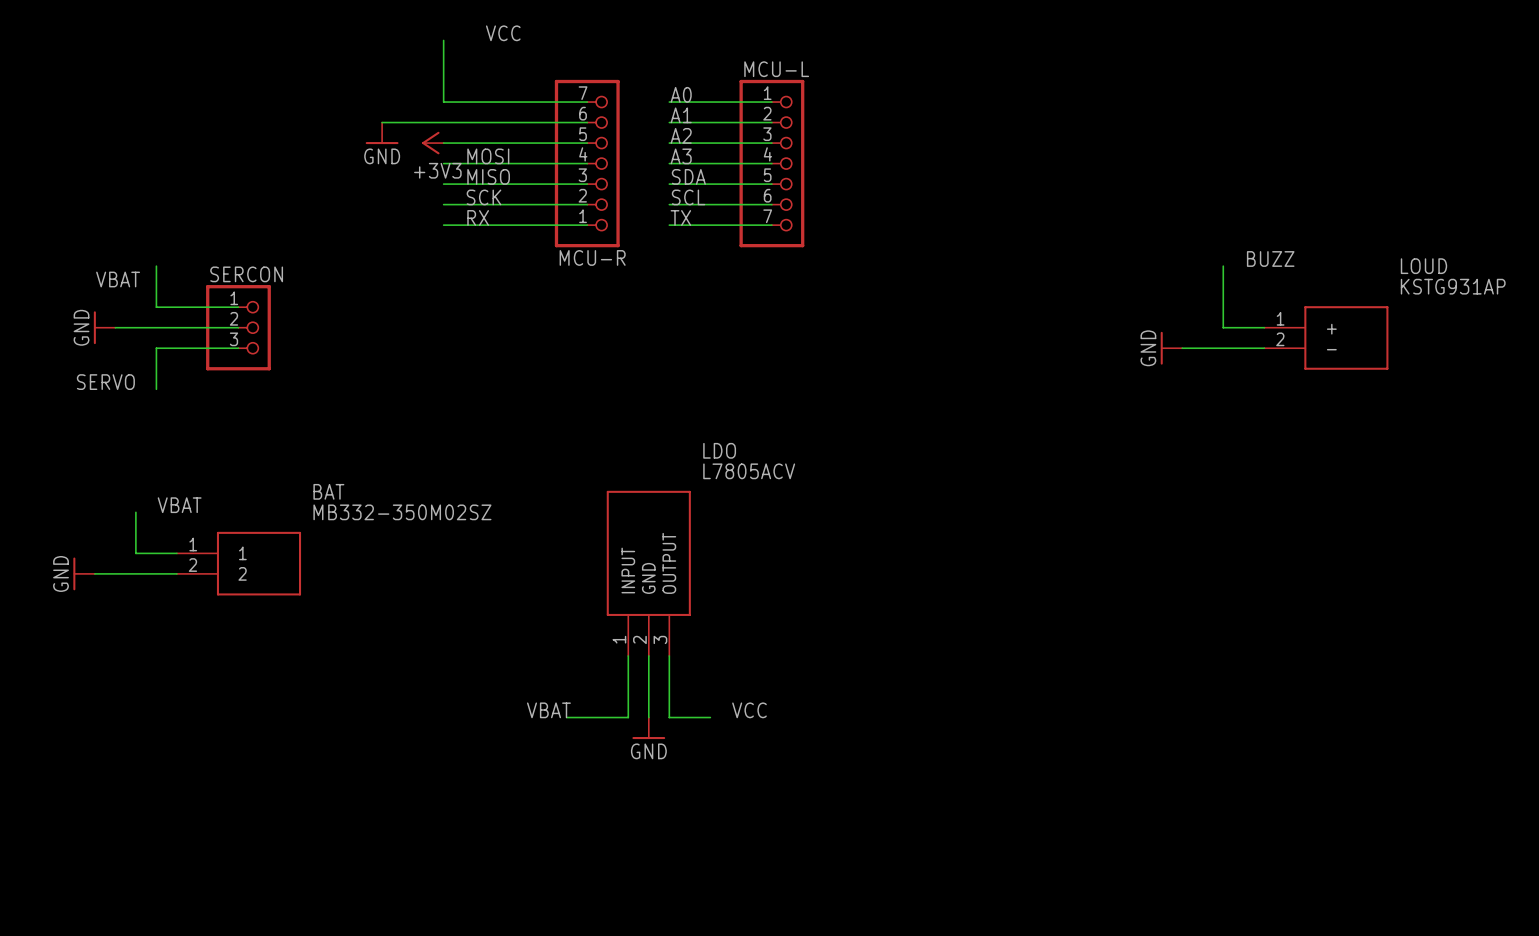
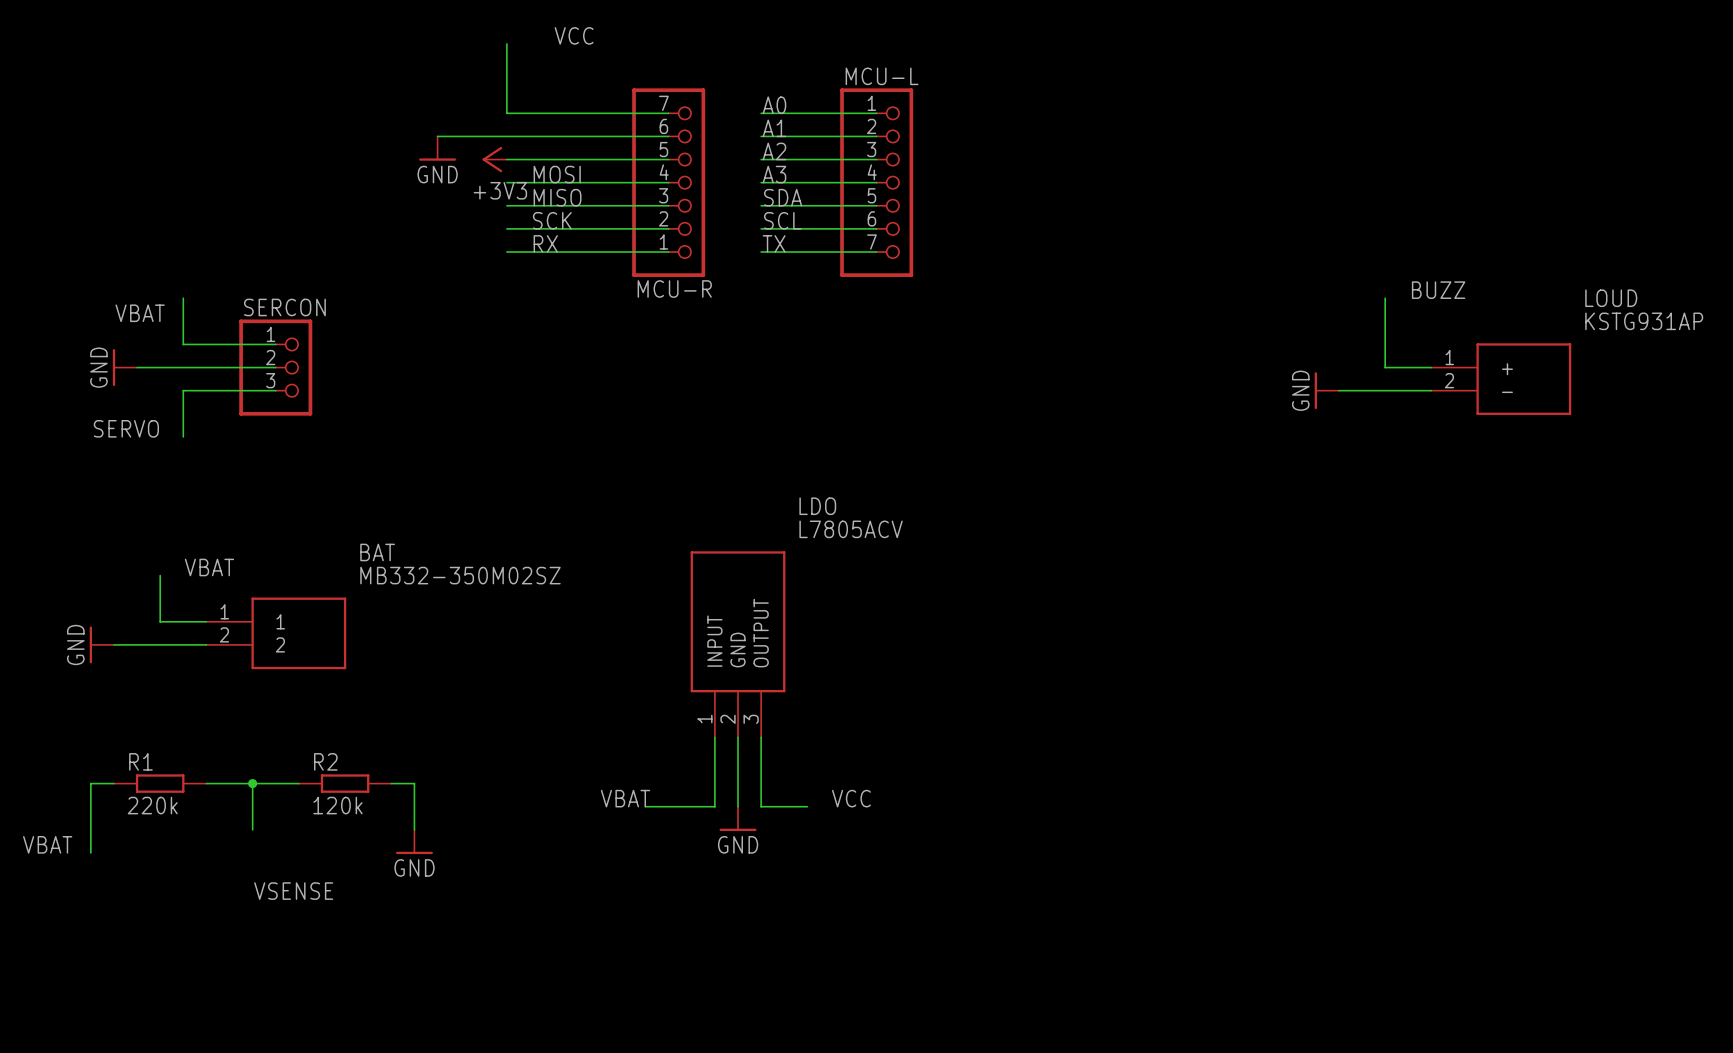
wire: none -> (113, 783) (90, 783) (90, 852)
R1: none -> 220k (160, 783)
wire: none -> (206, 783) (298, 783)
wire: none -> (252, 783) (252, 829)
junction: none -> (252, 783)
R2: none -> 120k (345, 783)
wire: none -> (391, 783) (414, 783) (414, 829)
power symbol: none -> GND (414, 841)
label: none -> VBAT (47, 844)
label: none -> VSENSE (293, 891)

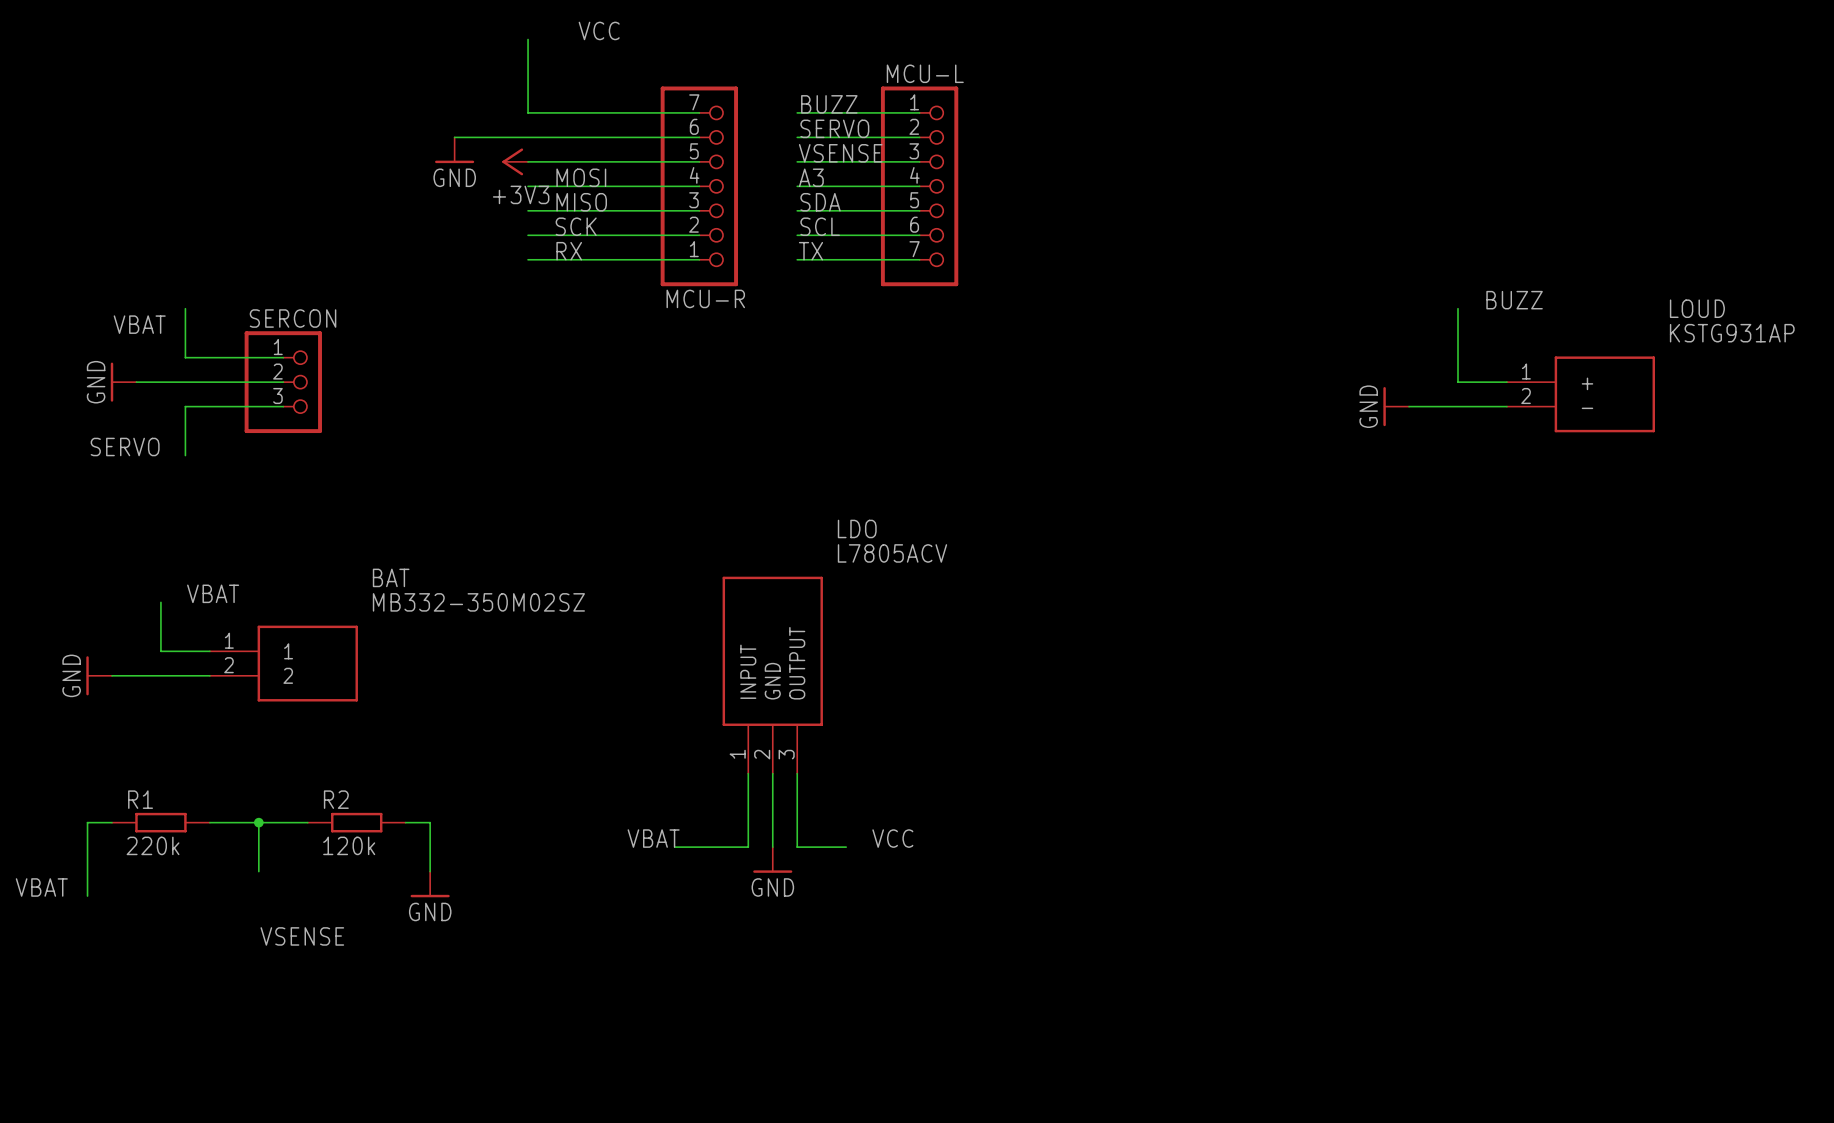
label: A0 (774, 105) -> BUZZ (829, 104)
label: A1 (774, 128) -> SERVO (834, 128)
label: A2 (774, 151) -> VSENSE (840, 153)

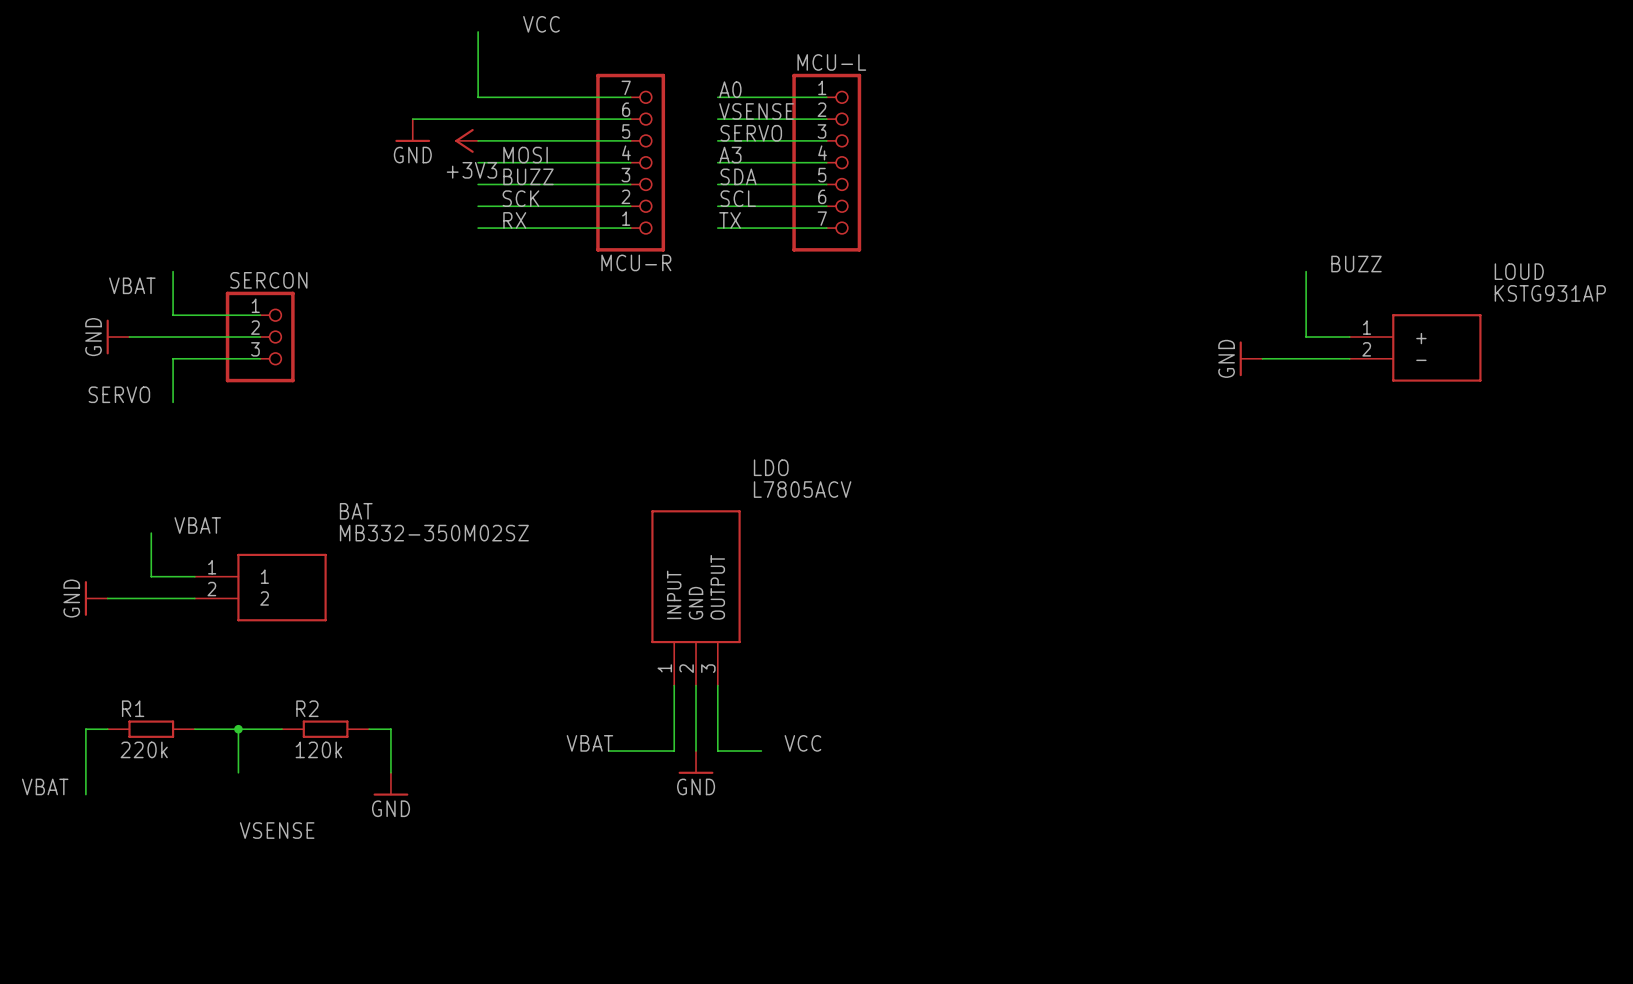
label: BUZZ (829, 104) -> A0 (730, 89)
label: SERVO (834, 128) -> VSENSE (756, 111)
label: VSENSE (840, 153) -> SERVO (751, 133)
label: MISO (581, 202) -> BUZZ (528, 176)

